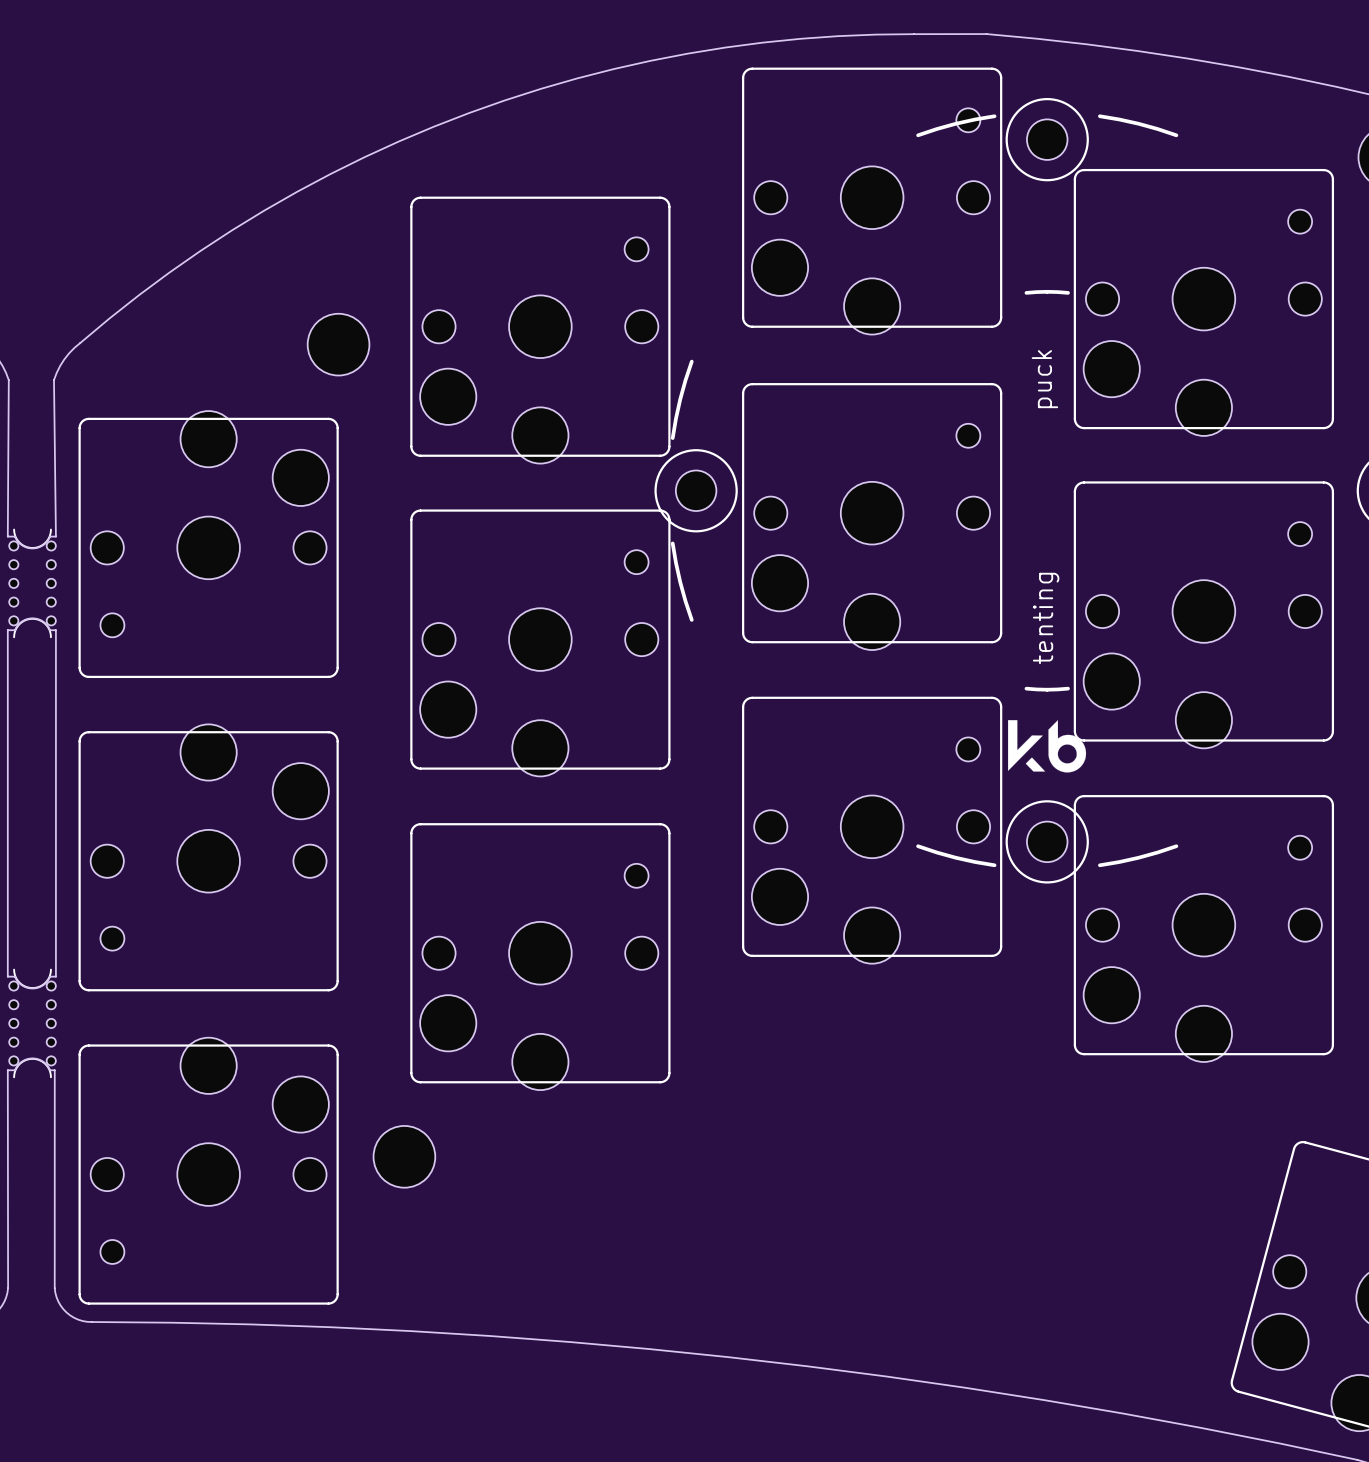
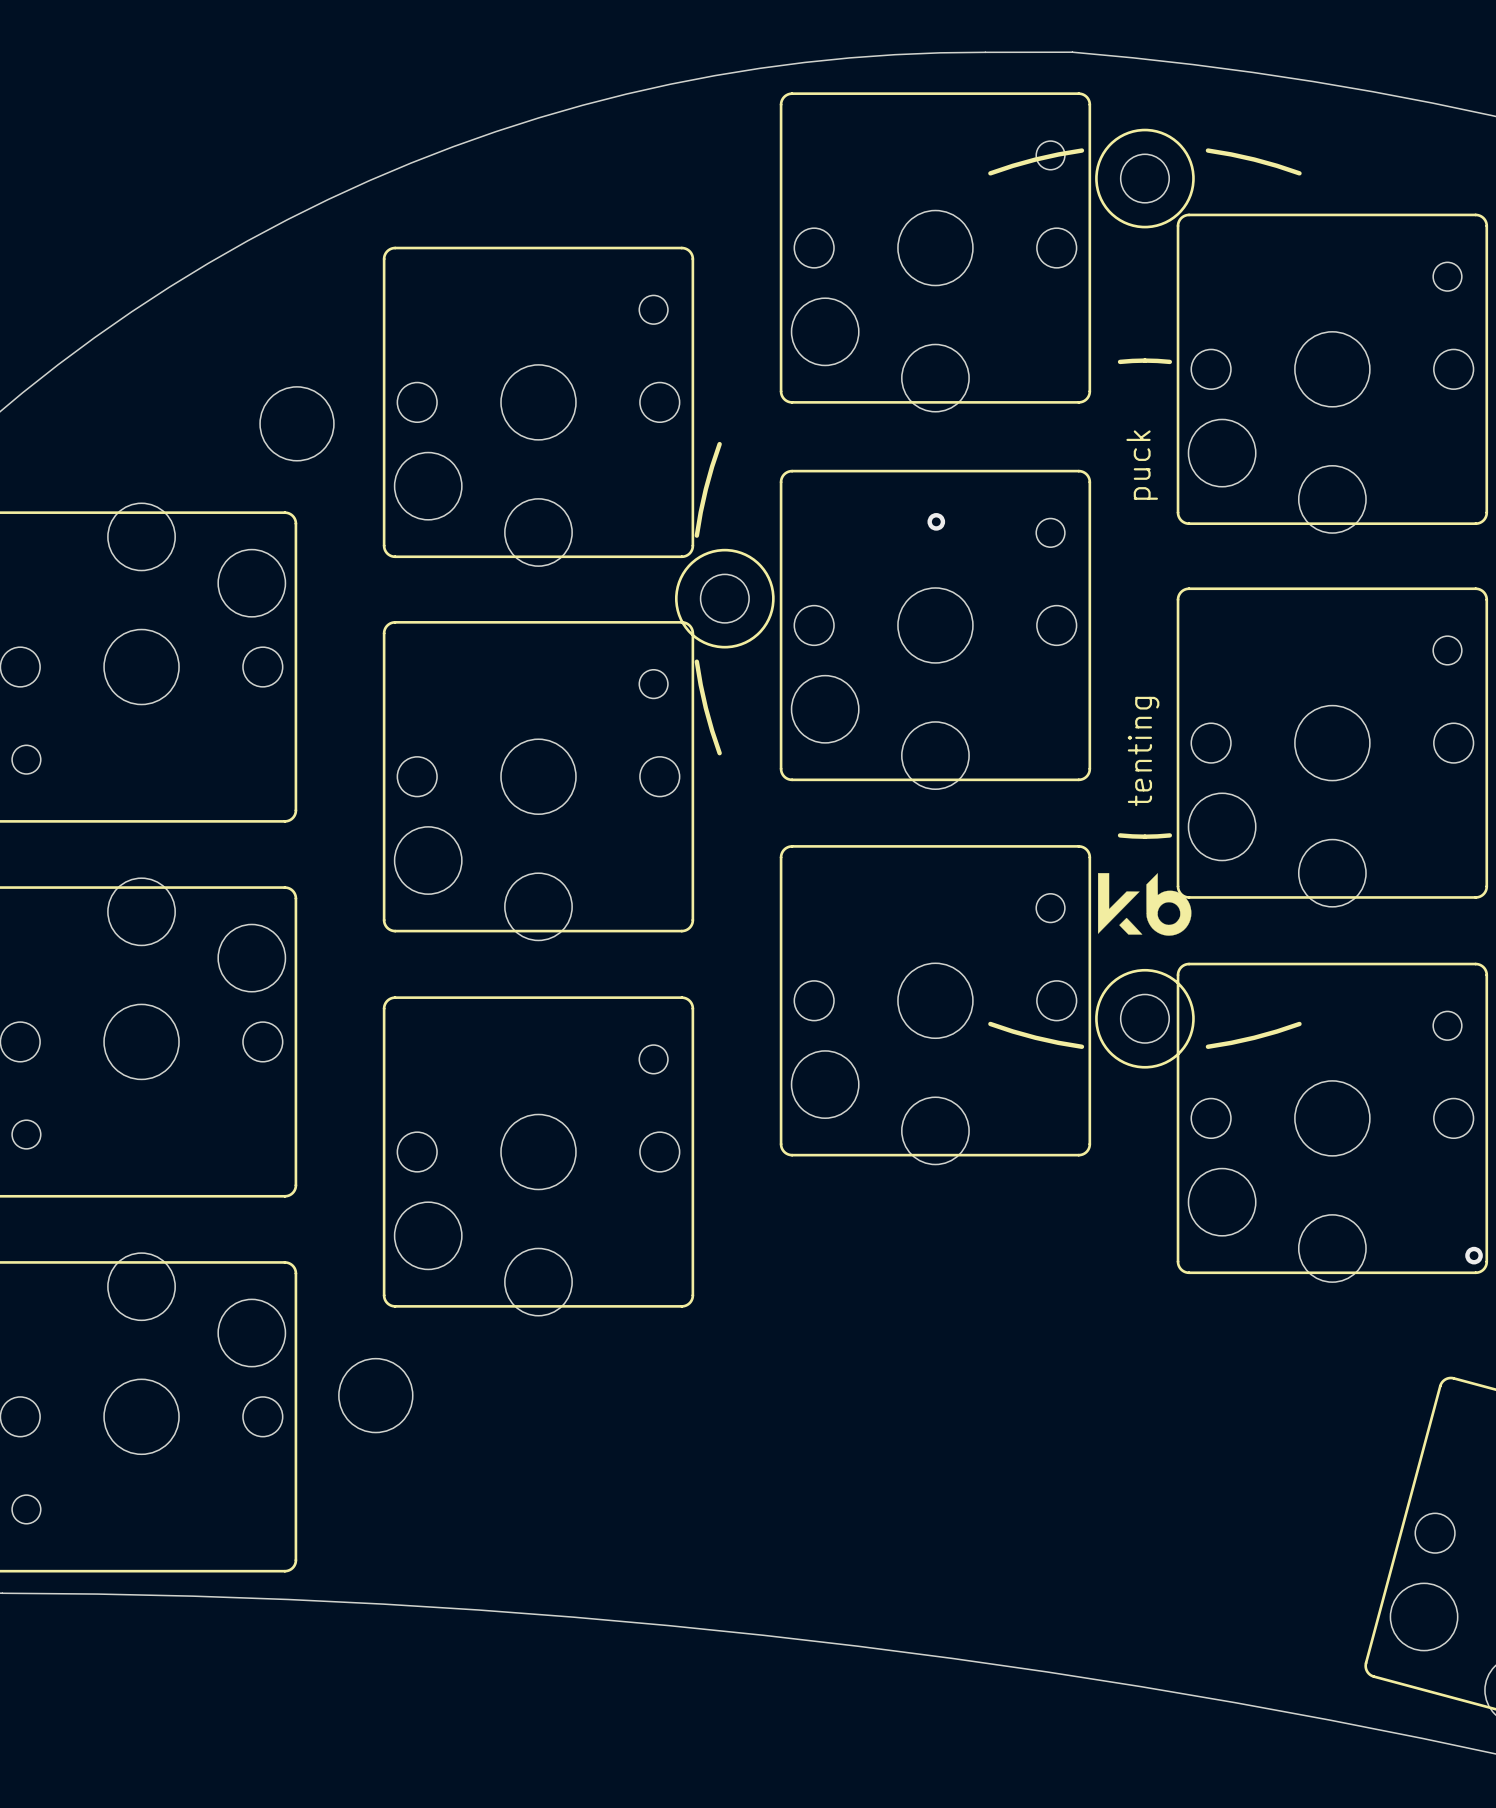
via: none -> (936, 521)
via: none -> (1474, 1255)

